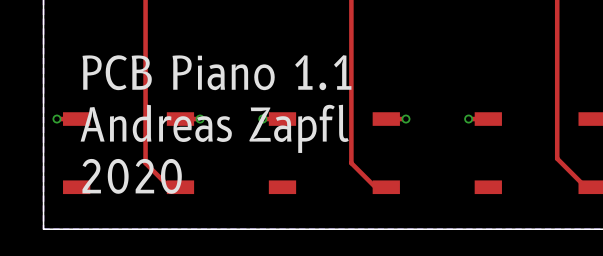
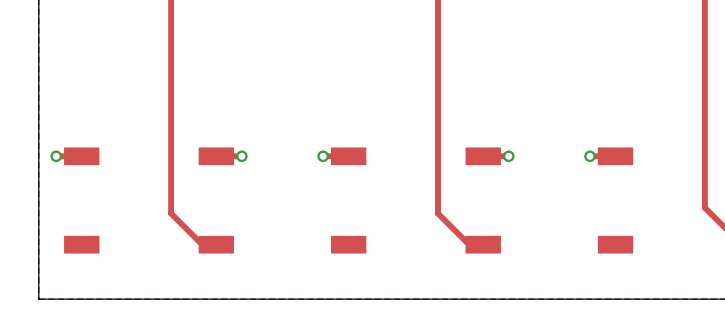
text: PCB Piano 1.1 (216, 72) -> none
text: Andreas Zapfl (214, 128) -> none
text: 2020 (132, 176) -> none

